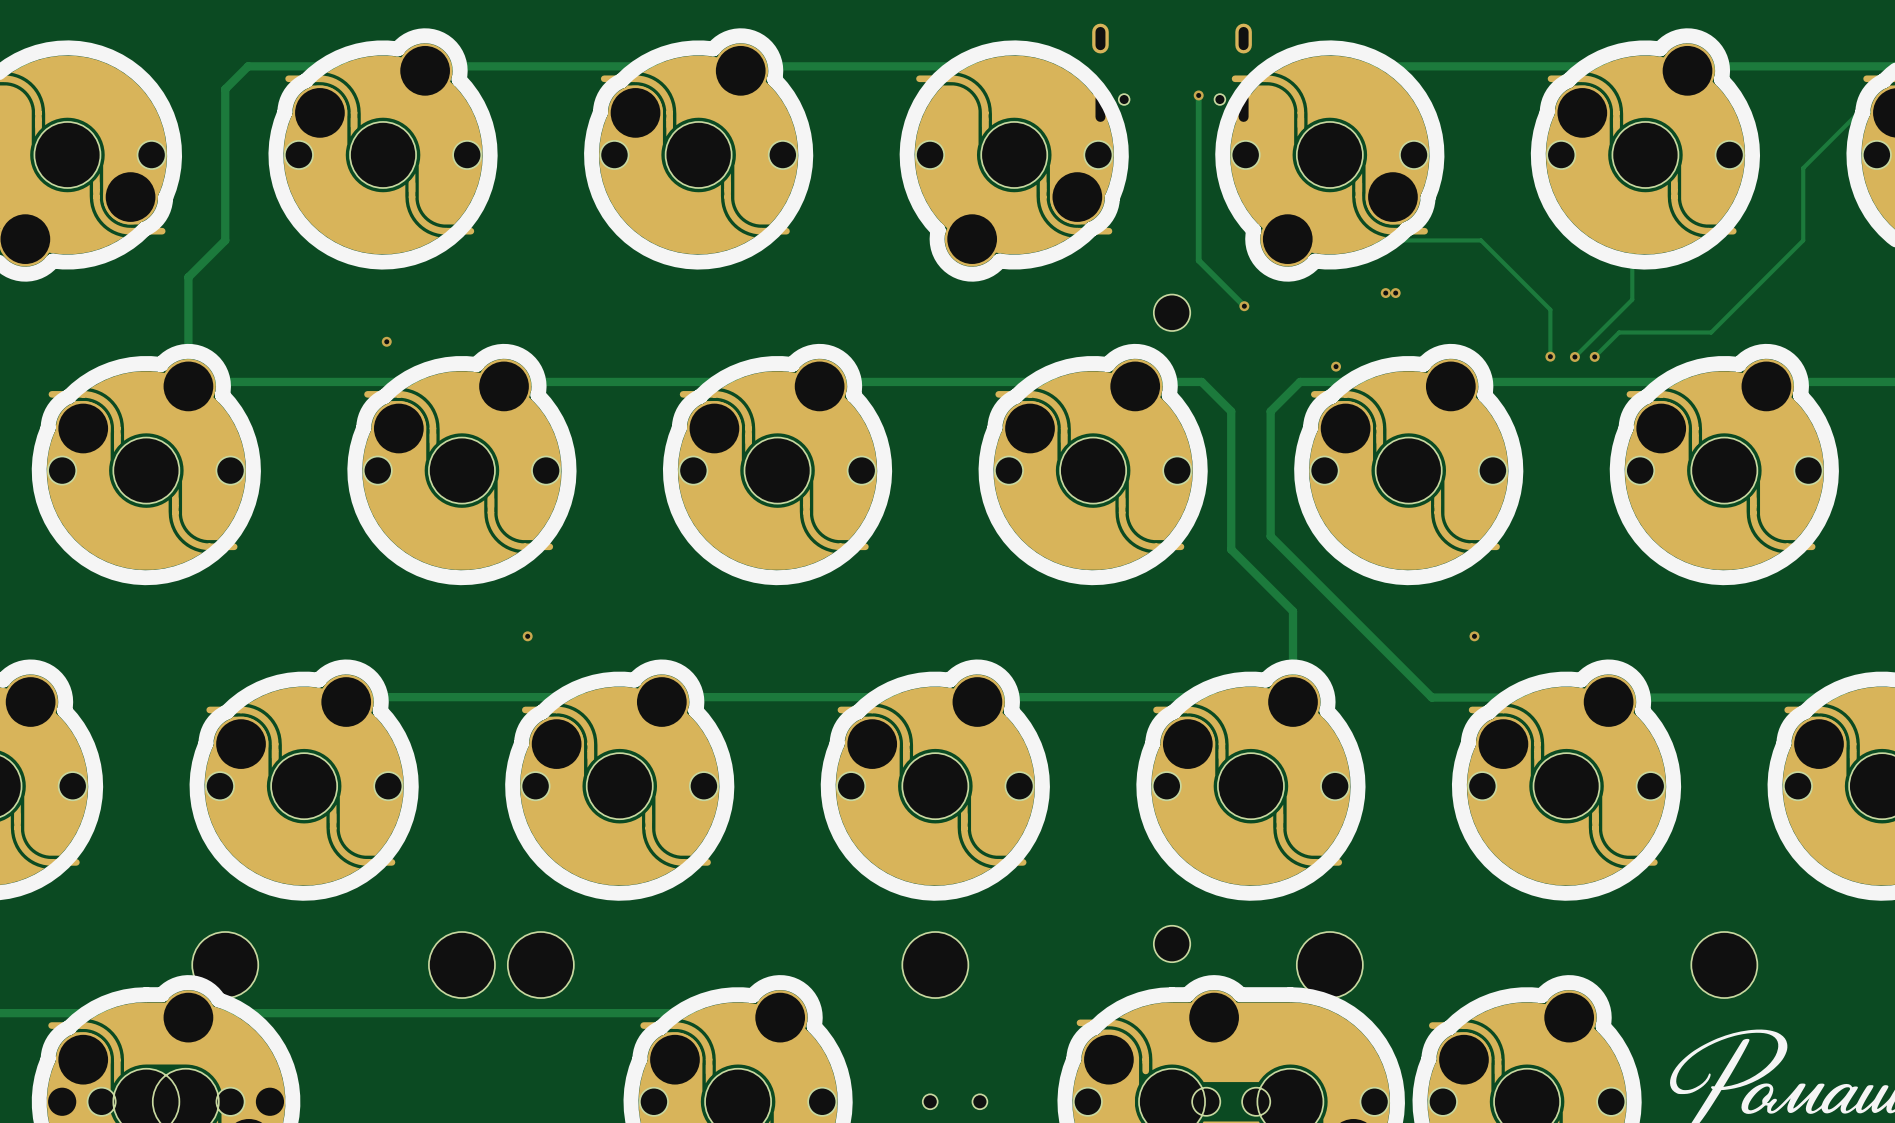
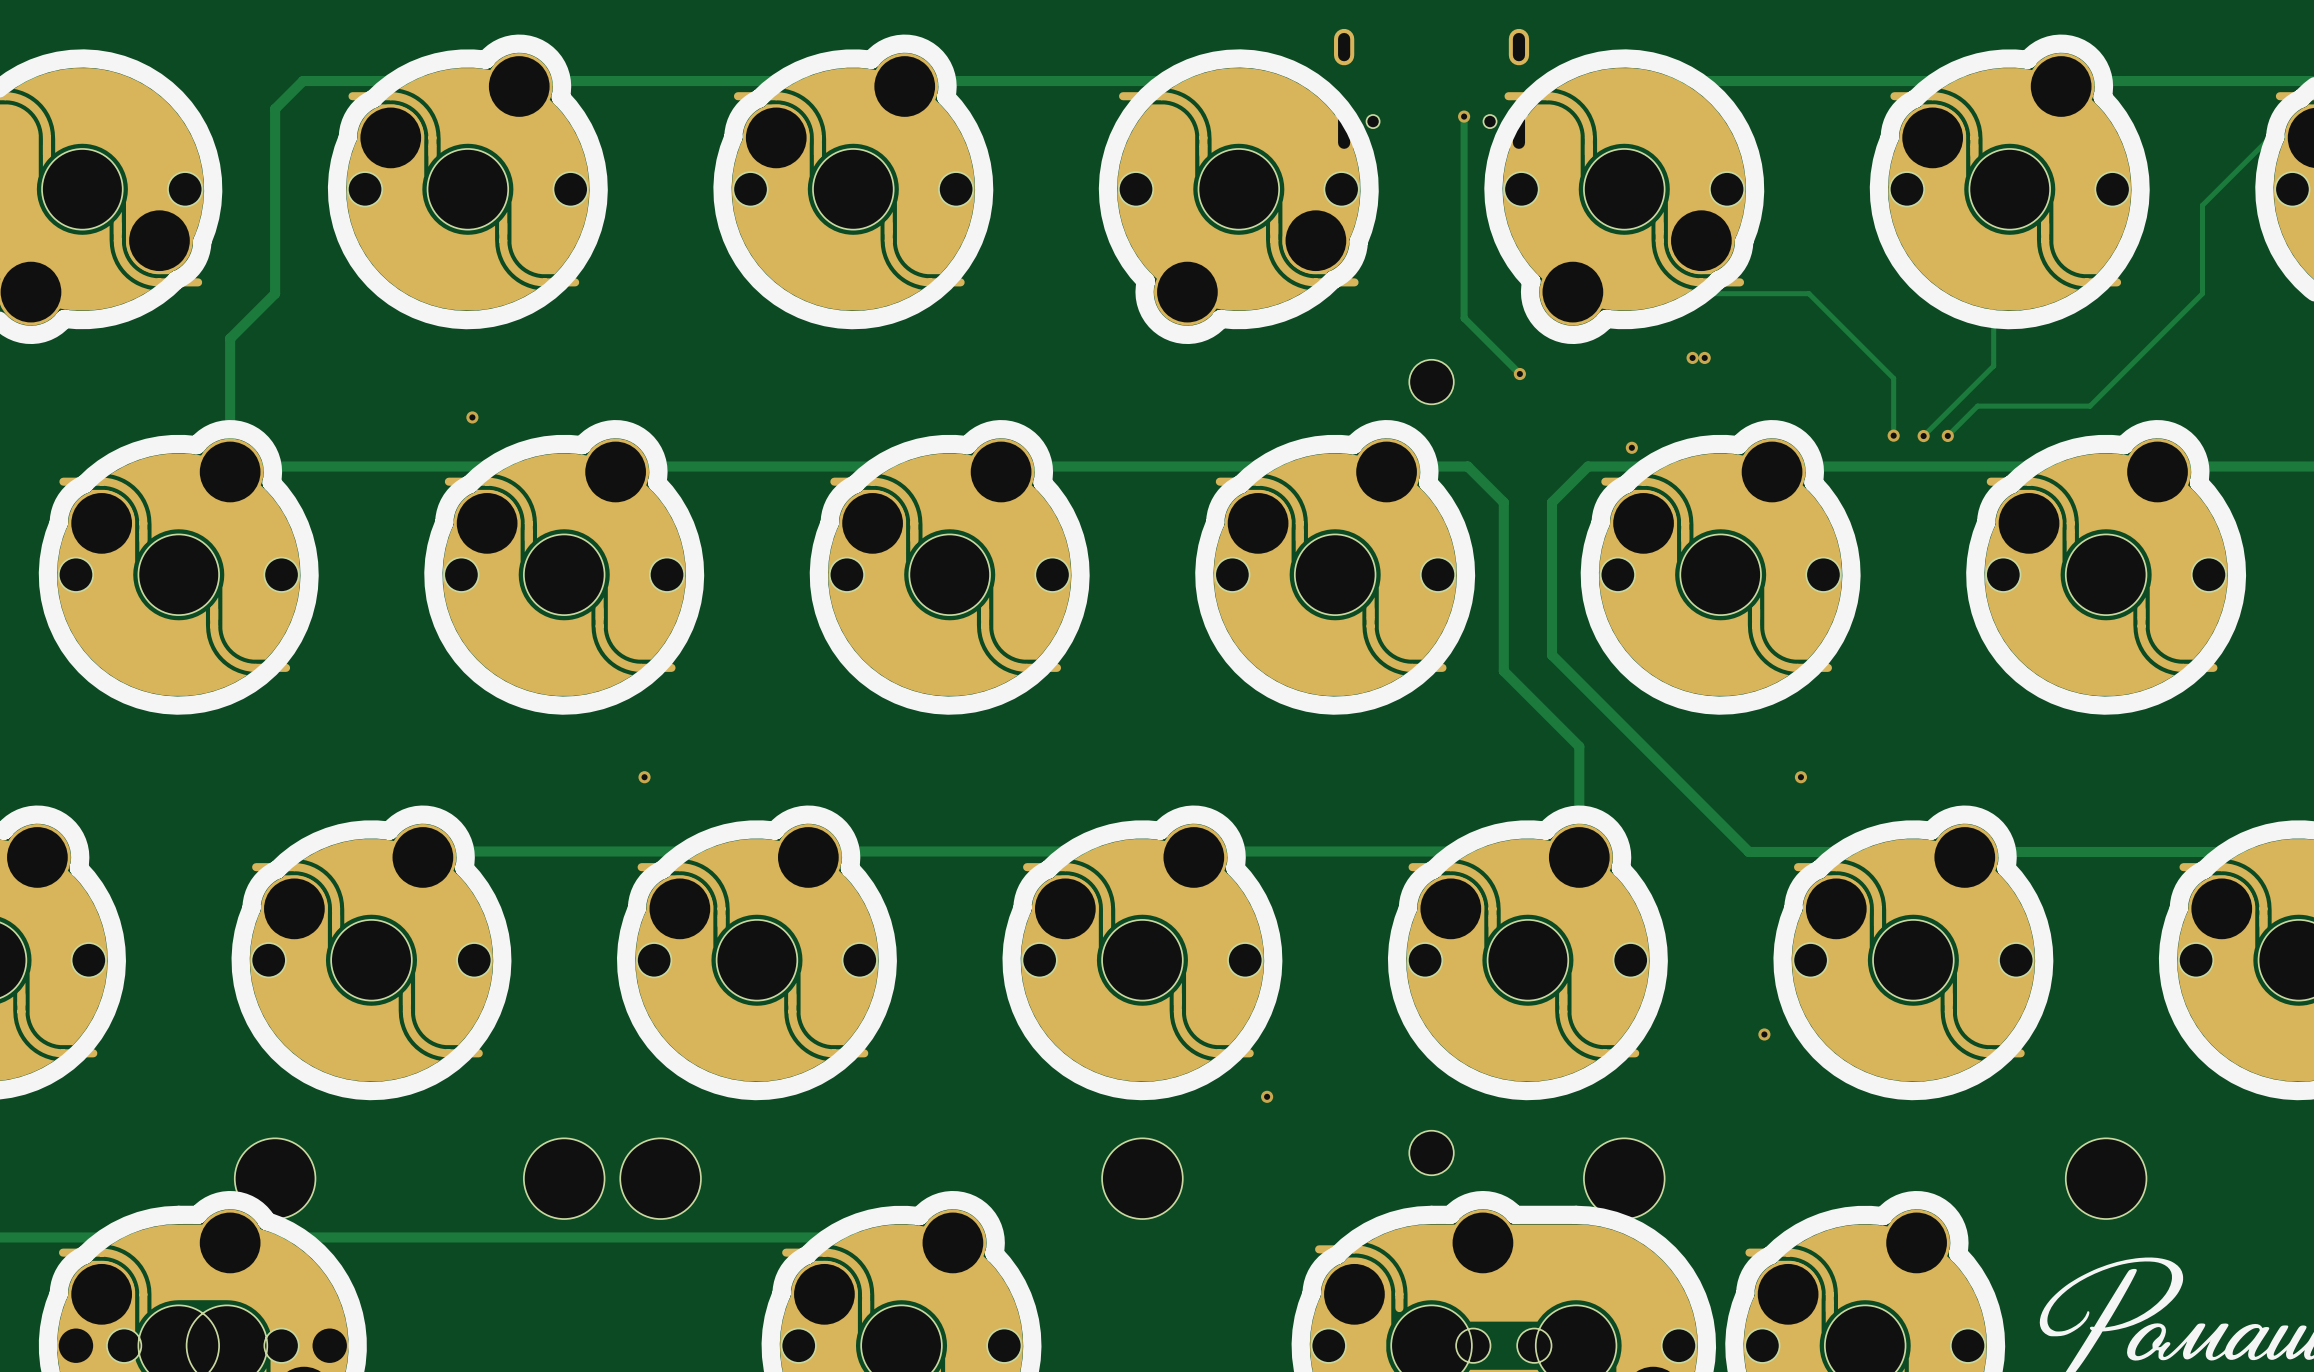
via: none -> (1764, 1034)
via: none -> (1267, 1096)
part: (955, 1101) -> none

